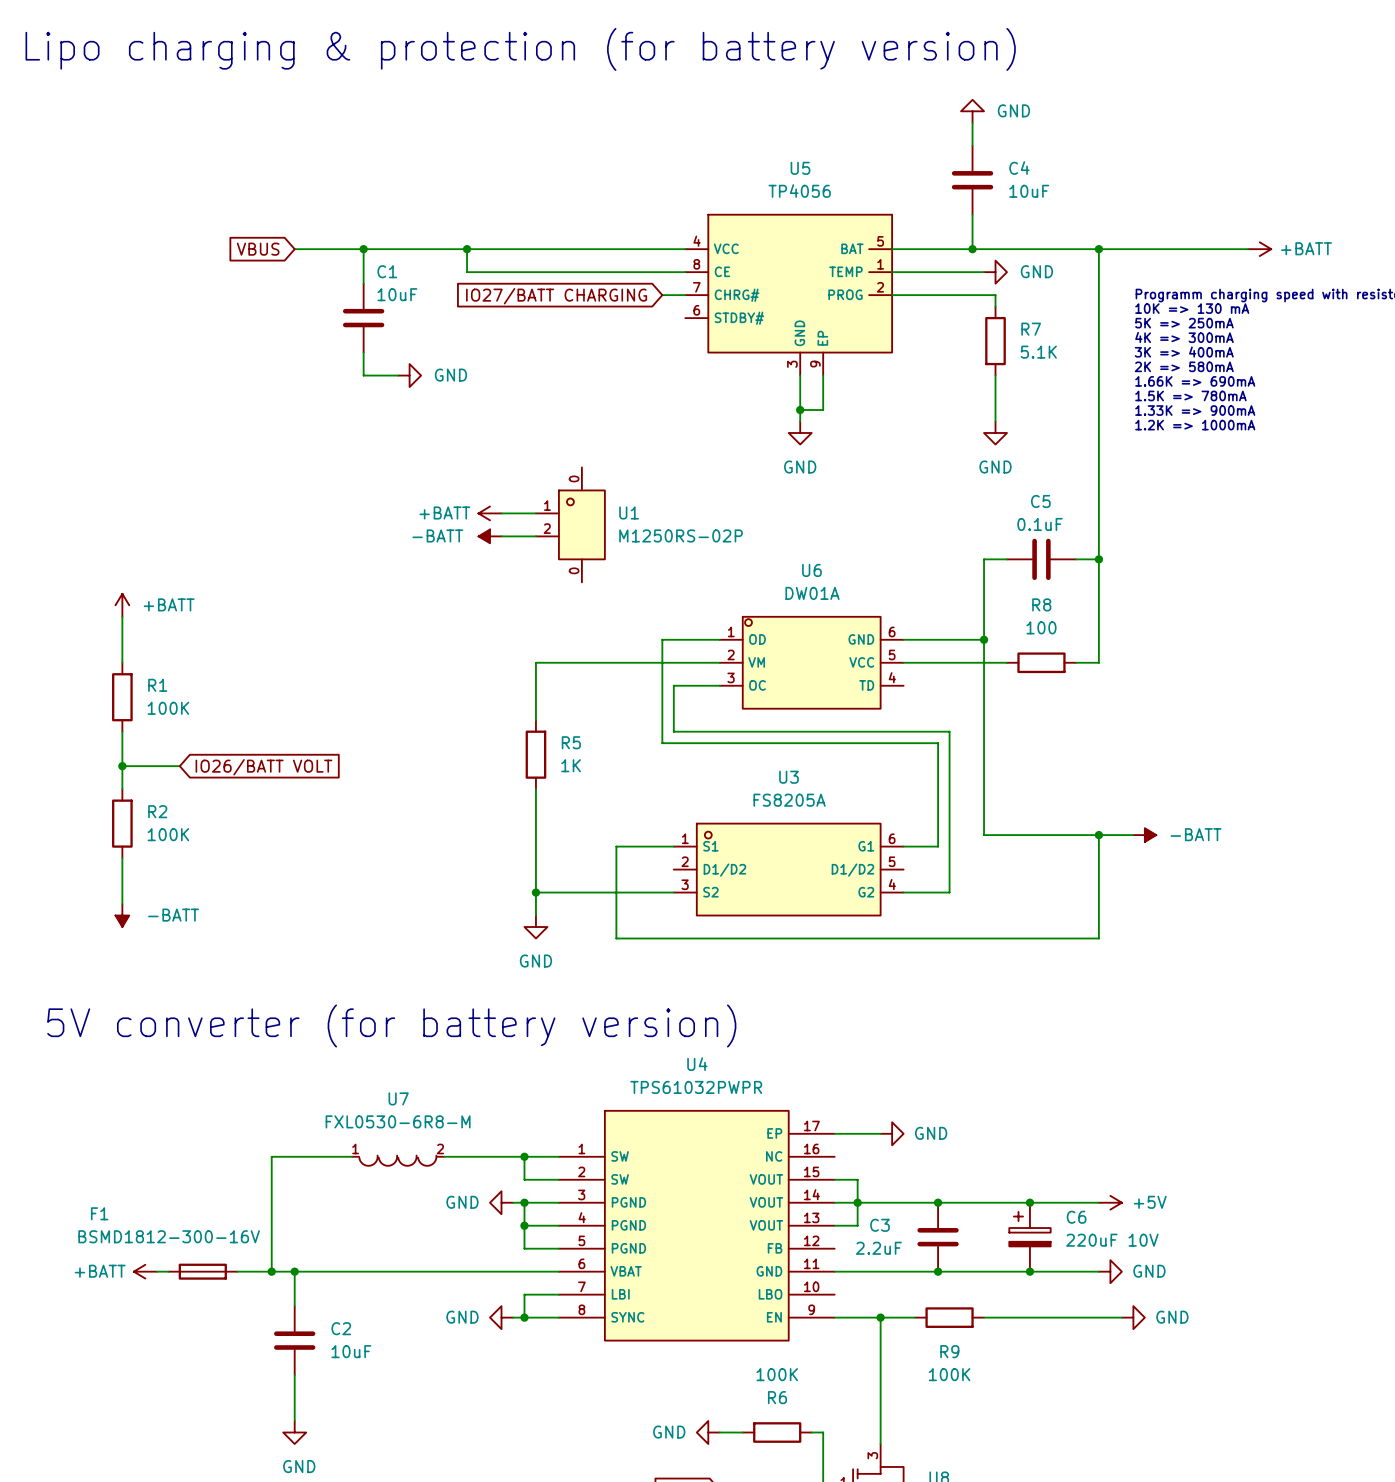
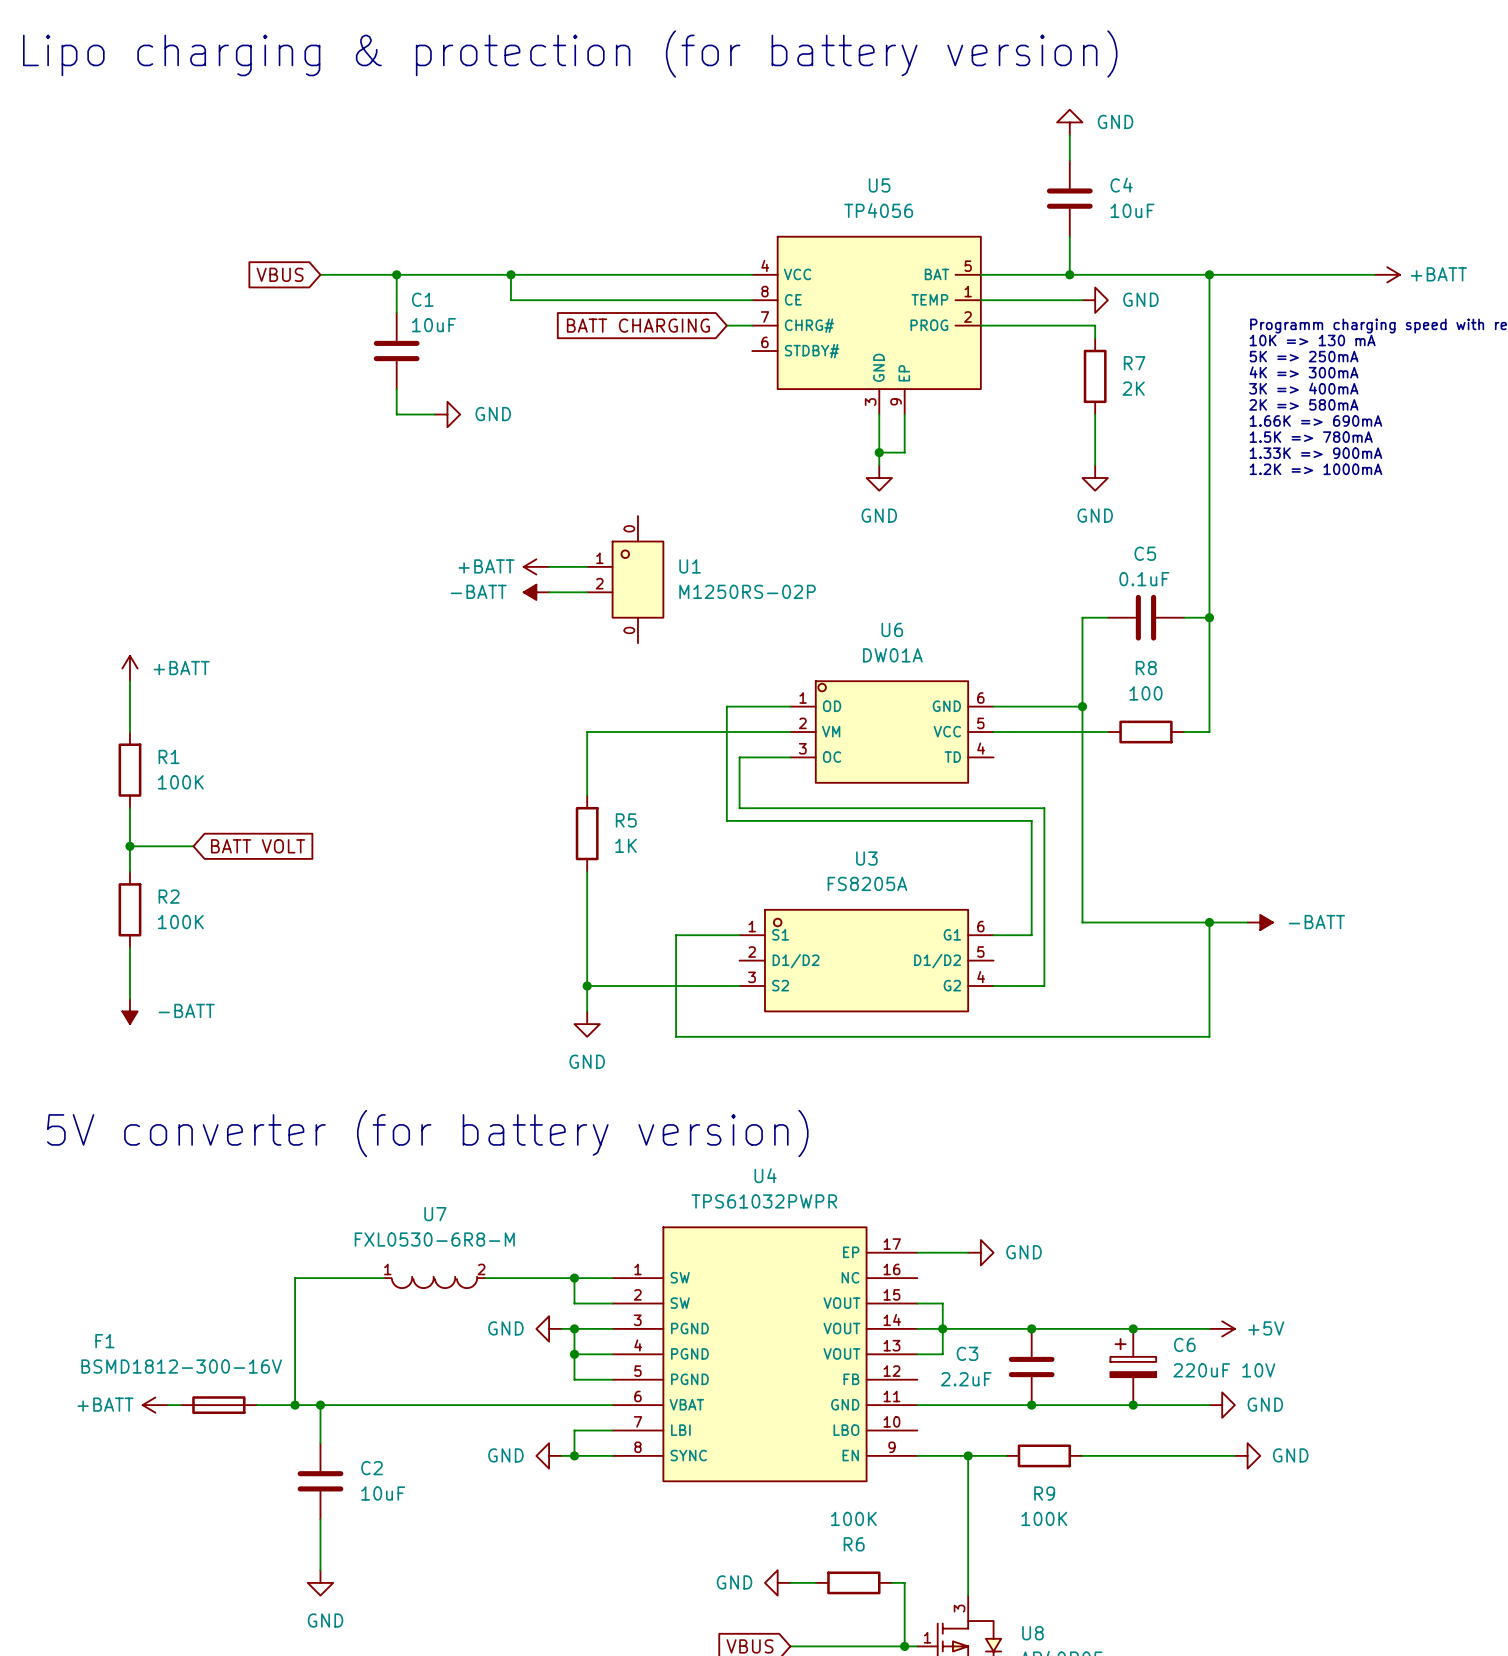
global label: IO27/BATT CHARGING (556, 296) -> BATT CHARGING (638, 325)
R7 value: 5.1K (1038, 352) -> 2K (1133, 388)
global label: IO26/BATT VOLT (263, 767) -> BATT VOLT (258, 846)

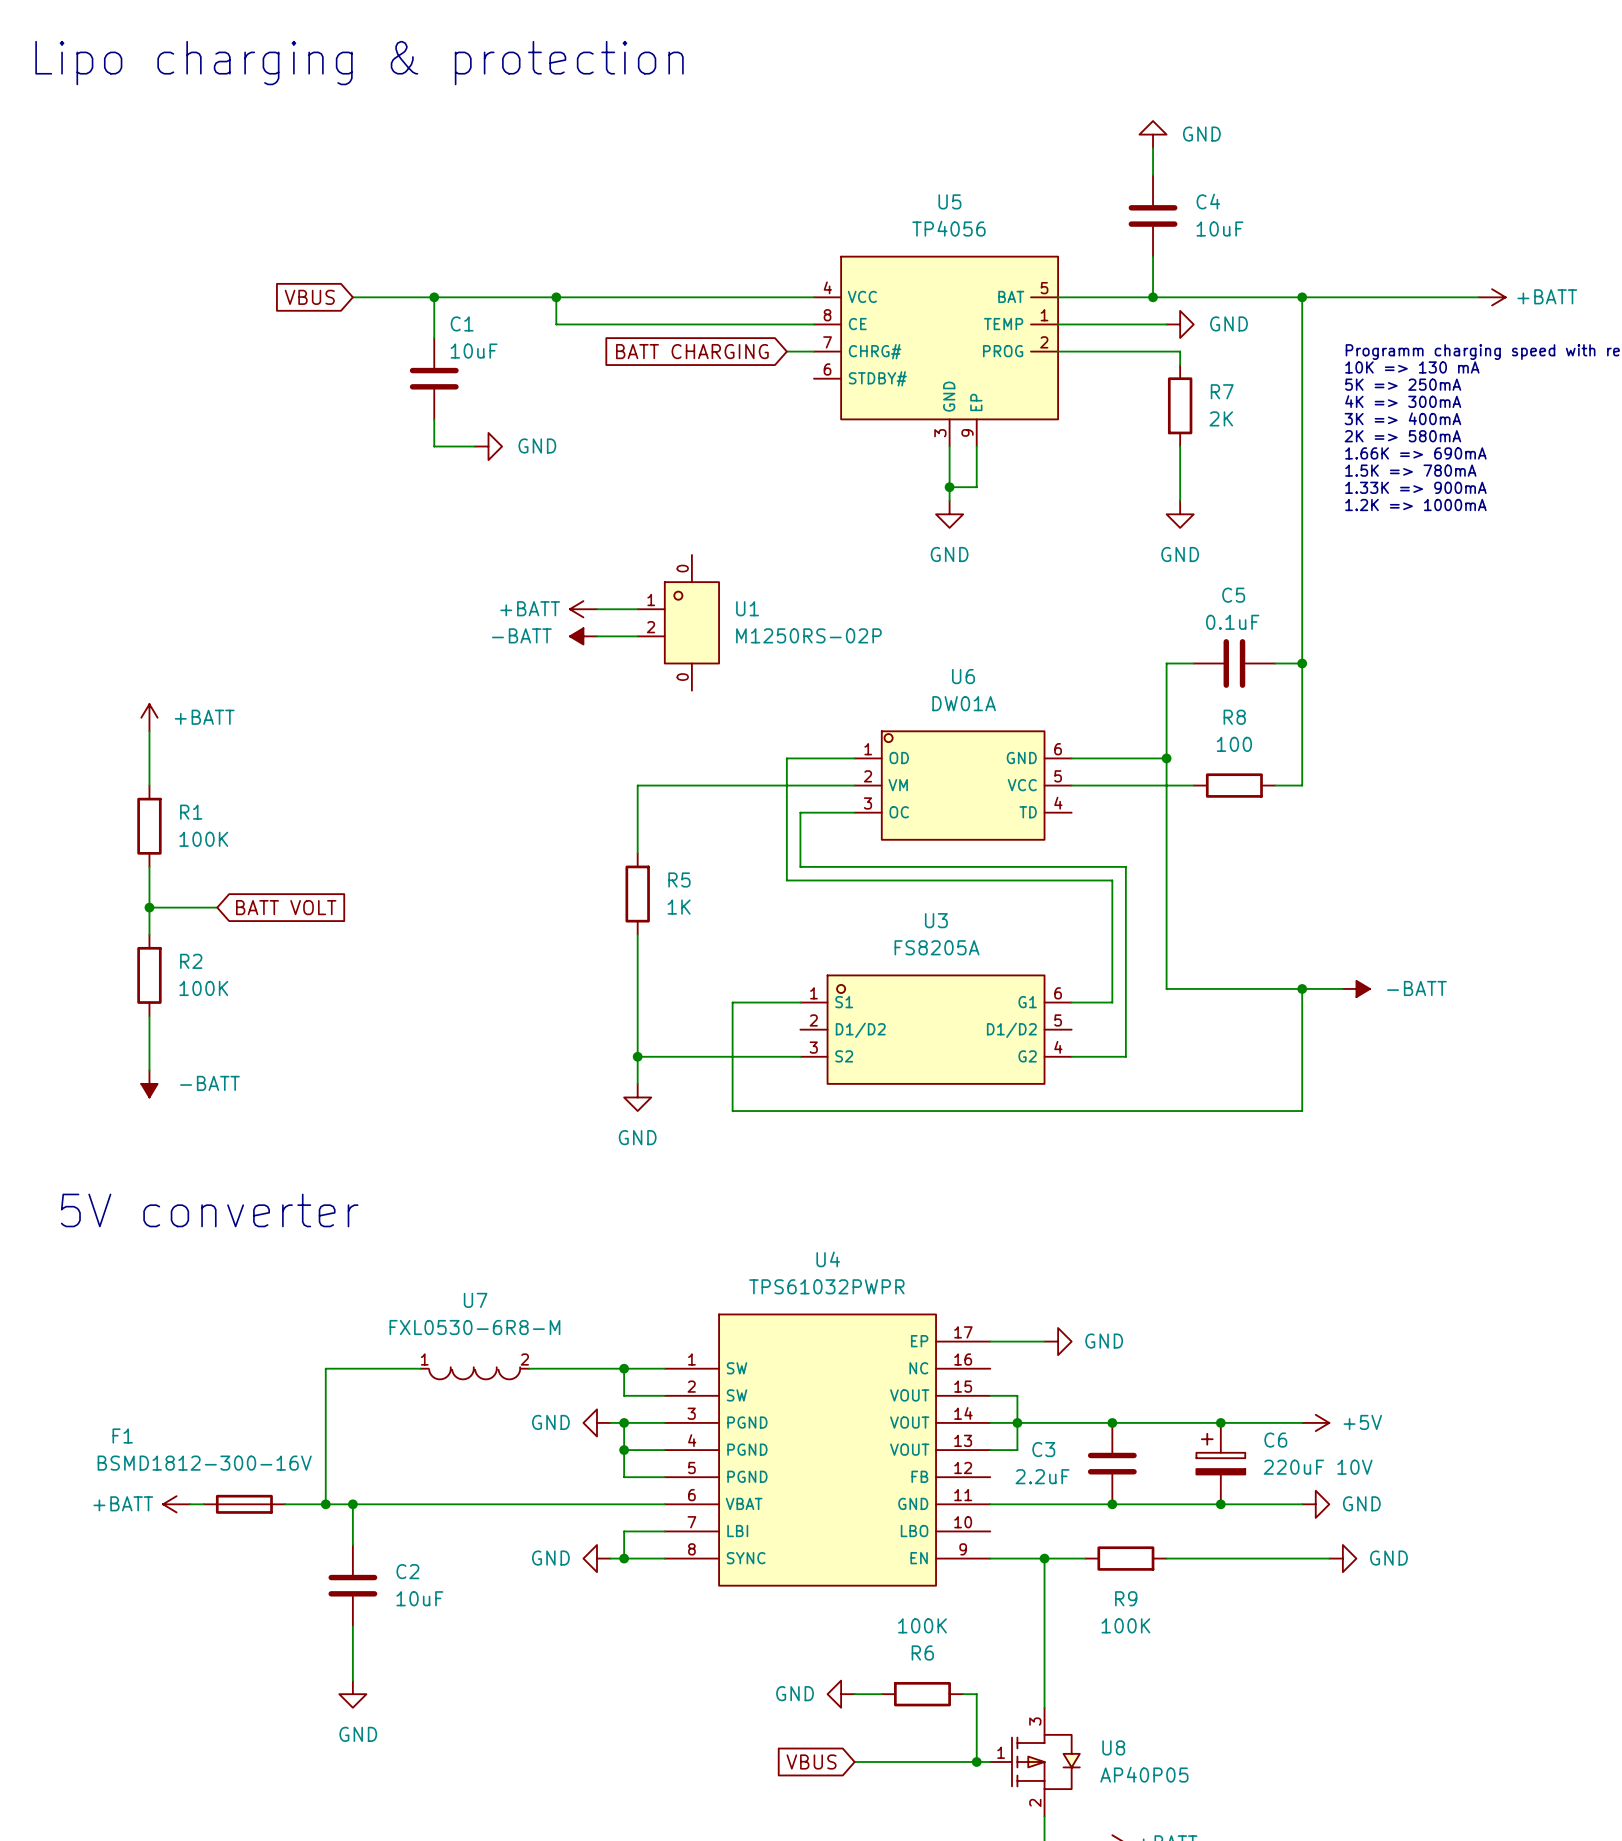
text: Lipo charging & protection (for battery version) (570, 54) -> Lipo charging & protection (359, 63)
text: 5V converter (for battery version) (427, 1133) -> 5V converter (209, 1210)

